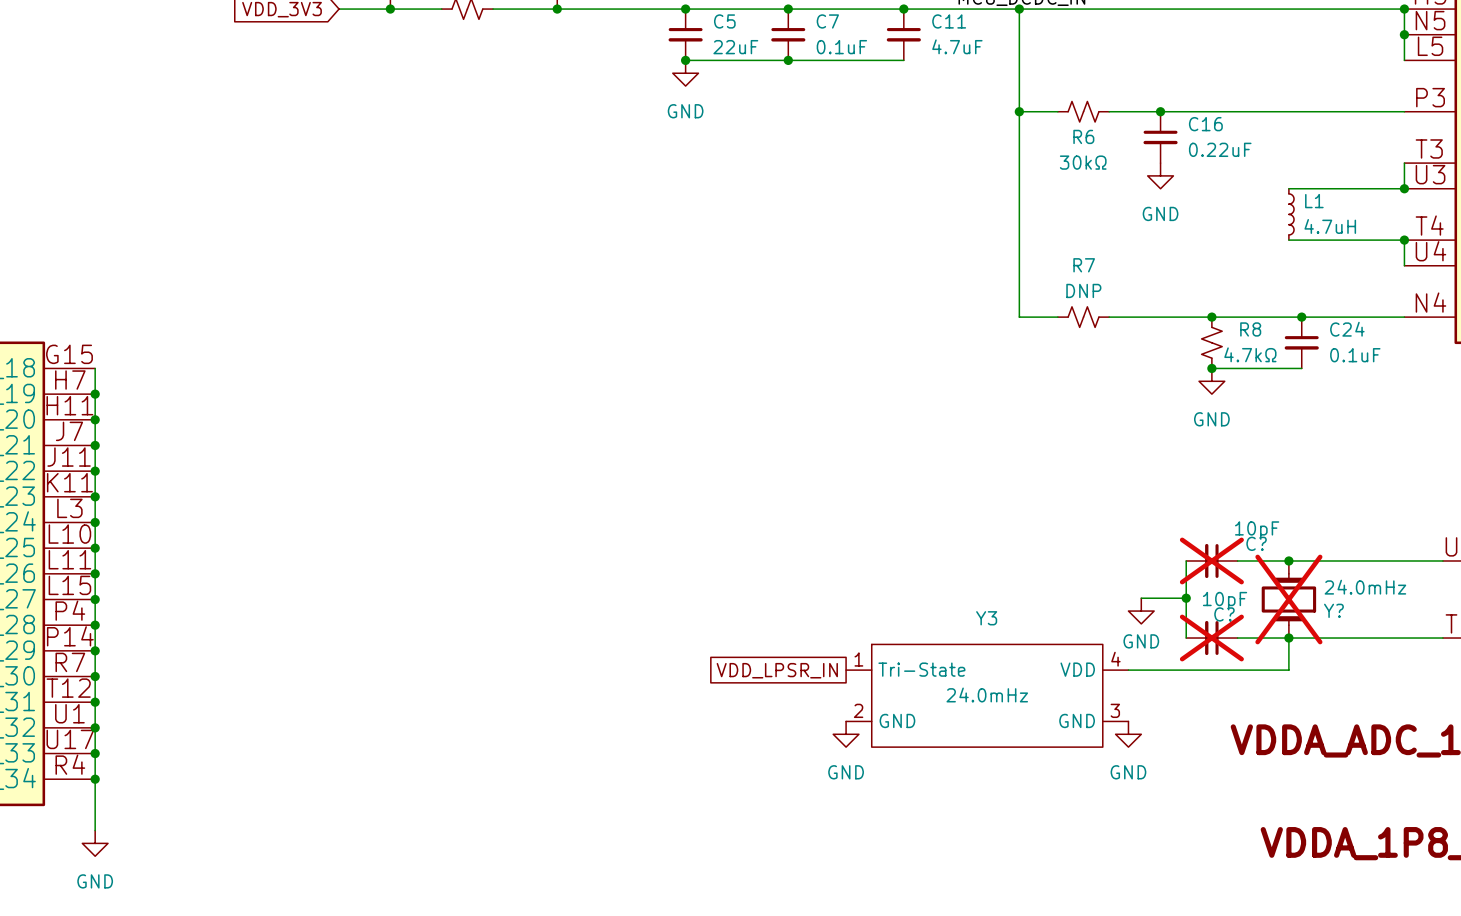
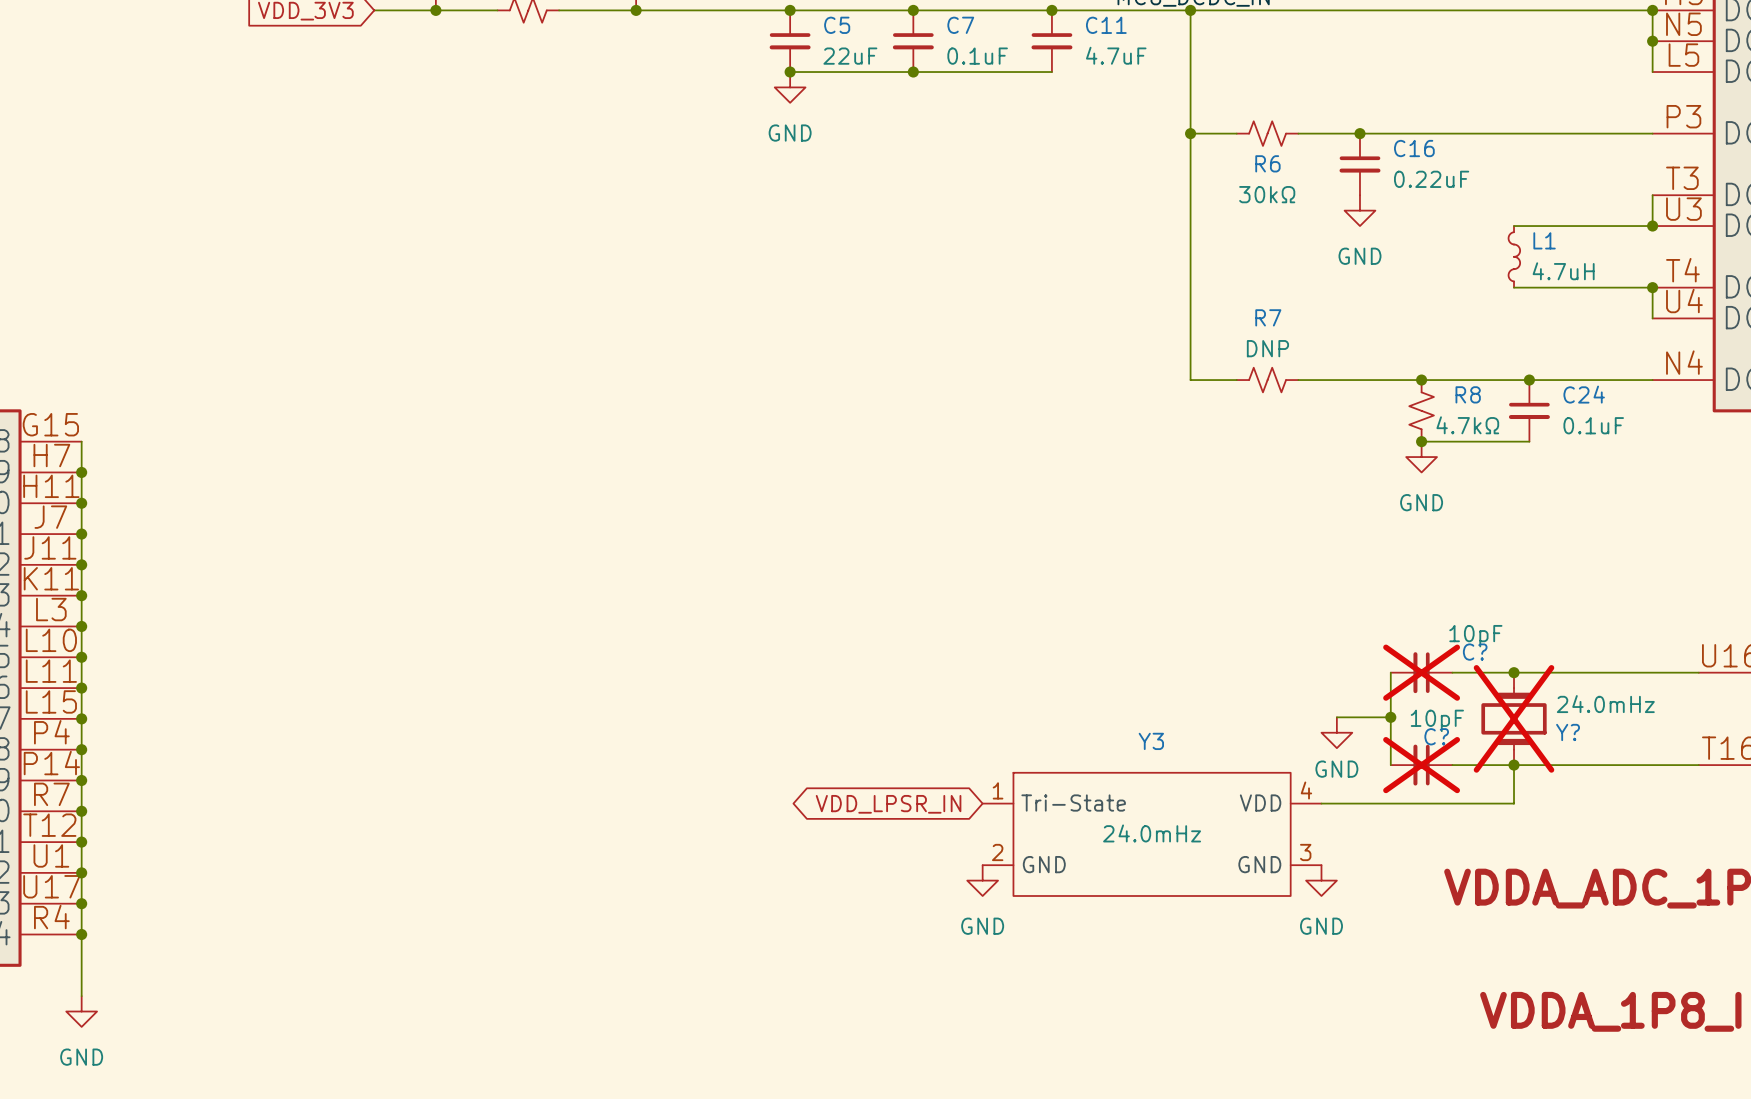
L1 symbol: [1288, 188, 1295, 241] -> [1508, 226, 1521, 288]
global label shape: passive (777, 670) -> bidirectional (888, 804)

